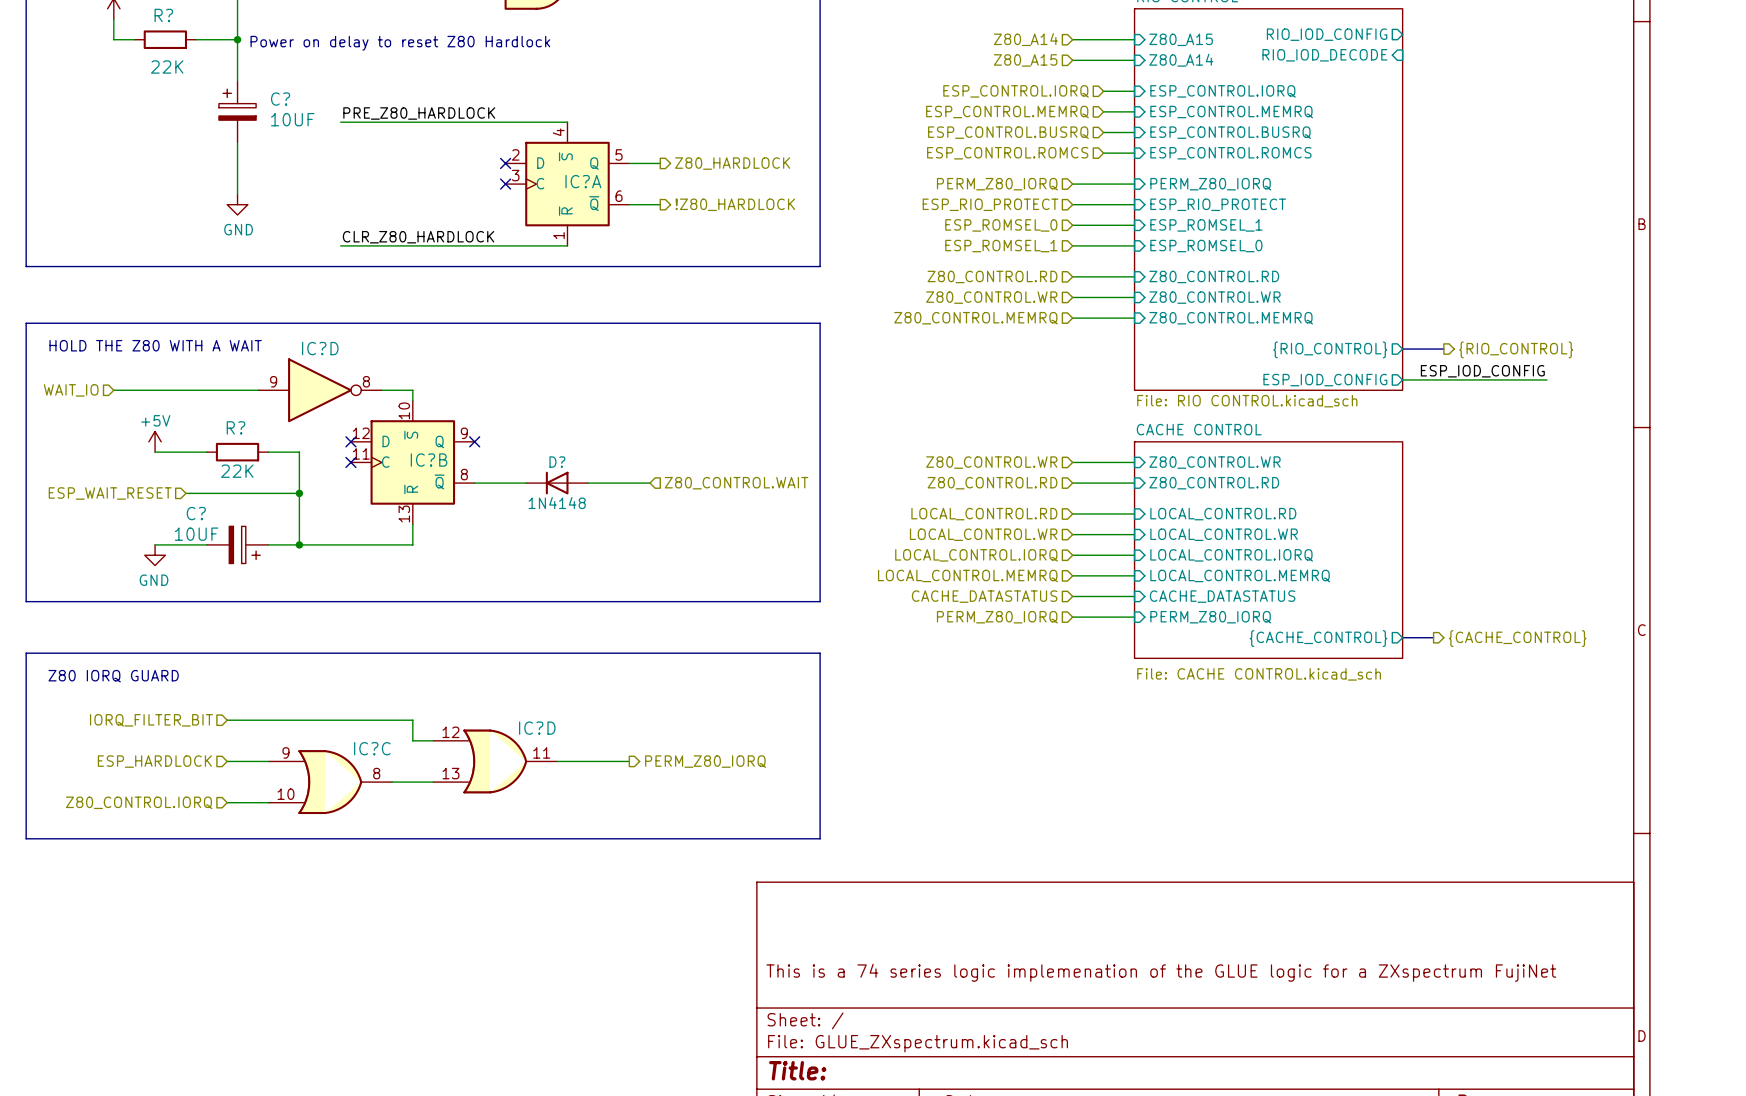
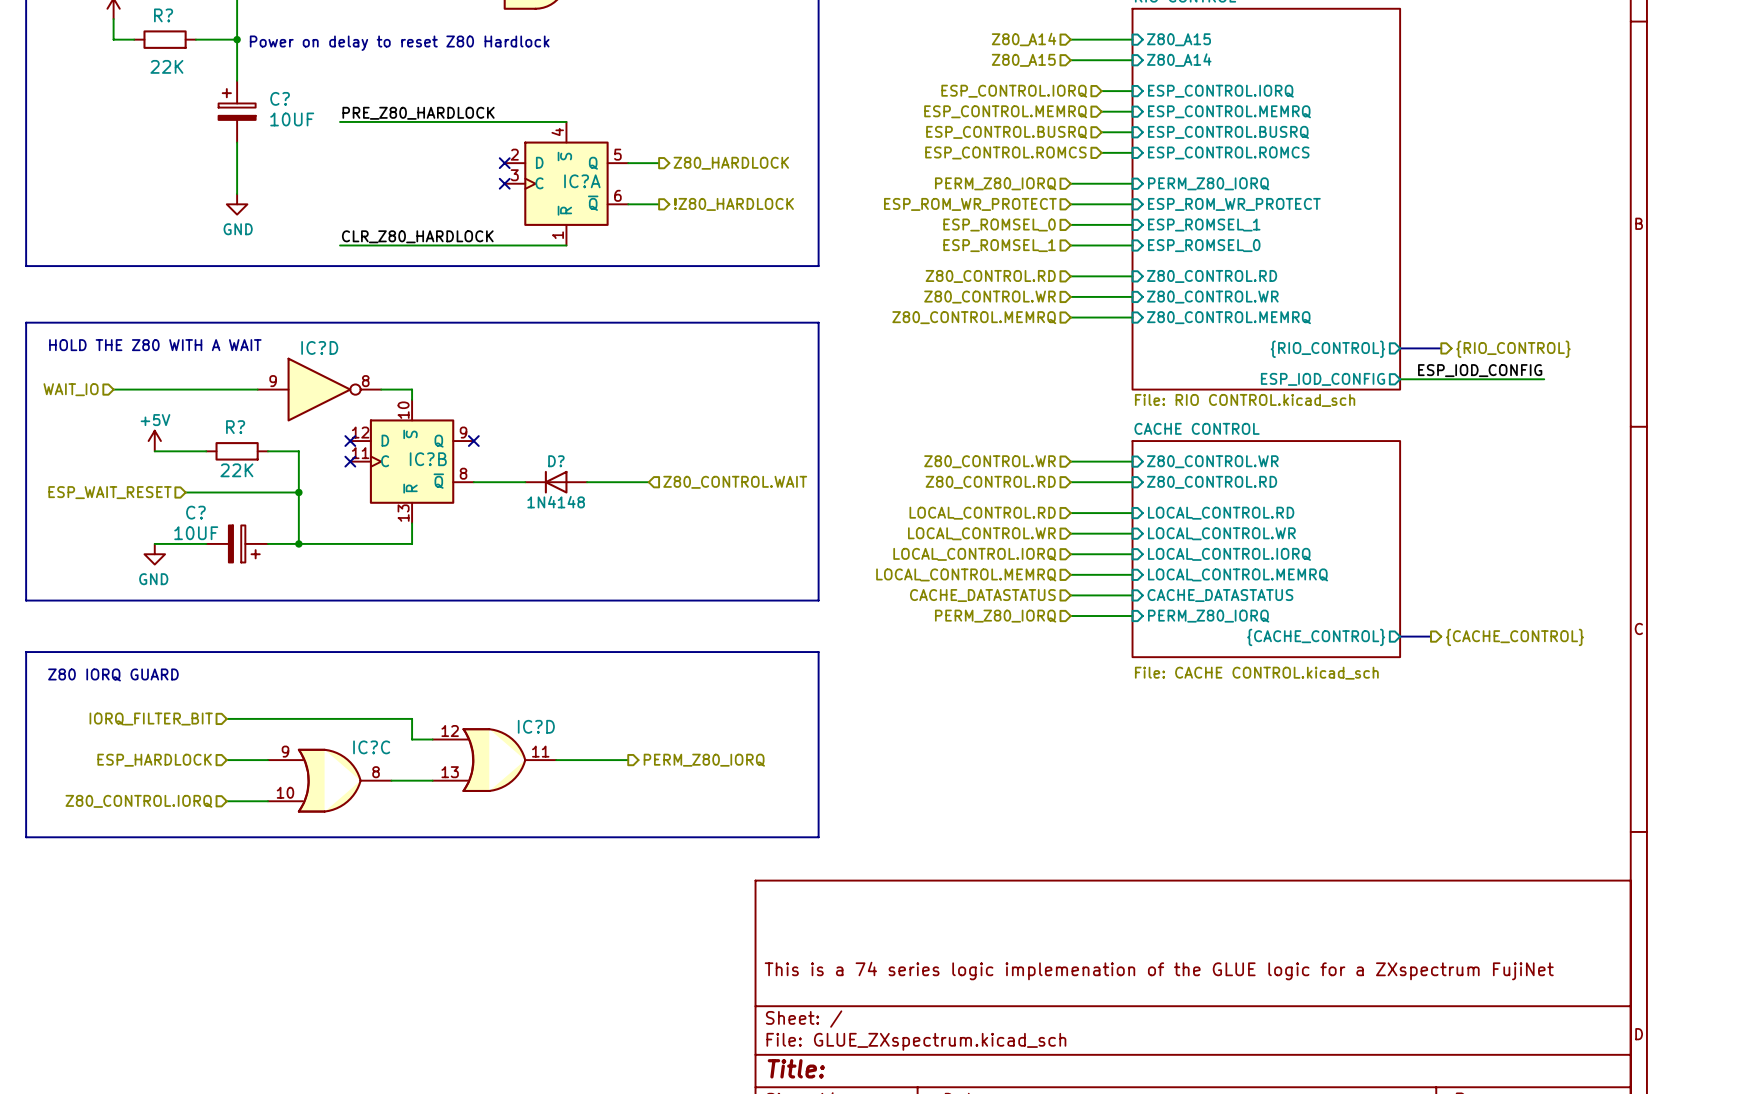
sheet pin: RIO_IOD_CONFIG (1327, 34) -> none
sheet pin: RIO_IOD_DECODE (1324, 55) -> none
hierarchical label: ESP_RIO_PROTECT (990, 204) -> ESP_ROM_WR_PROTECT (970, 204)
sheet pin: ESP_RIO_PROTECT (1218, 204) -> ESP_ROM_WR_PROTECT (1234, 204)

